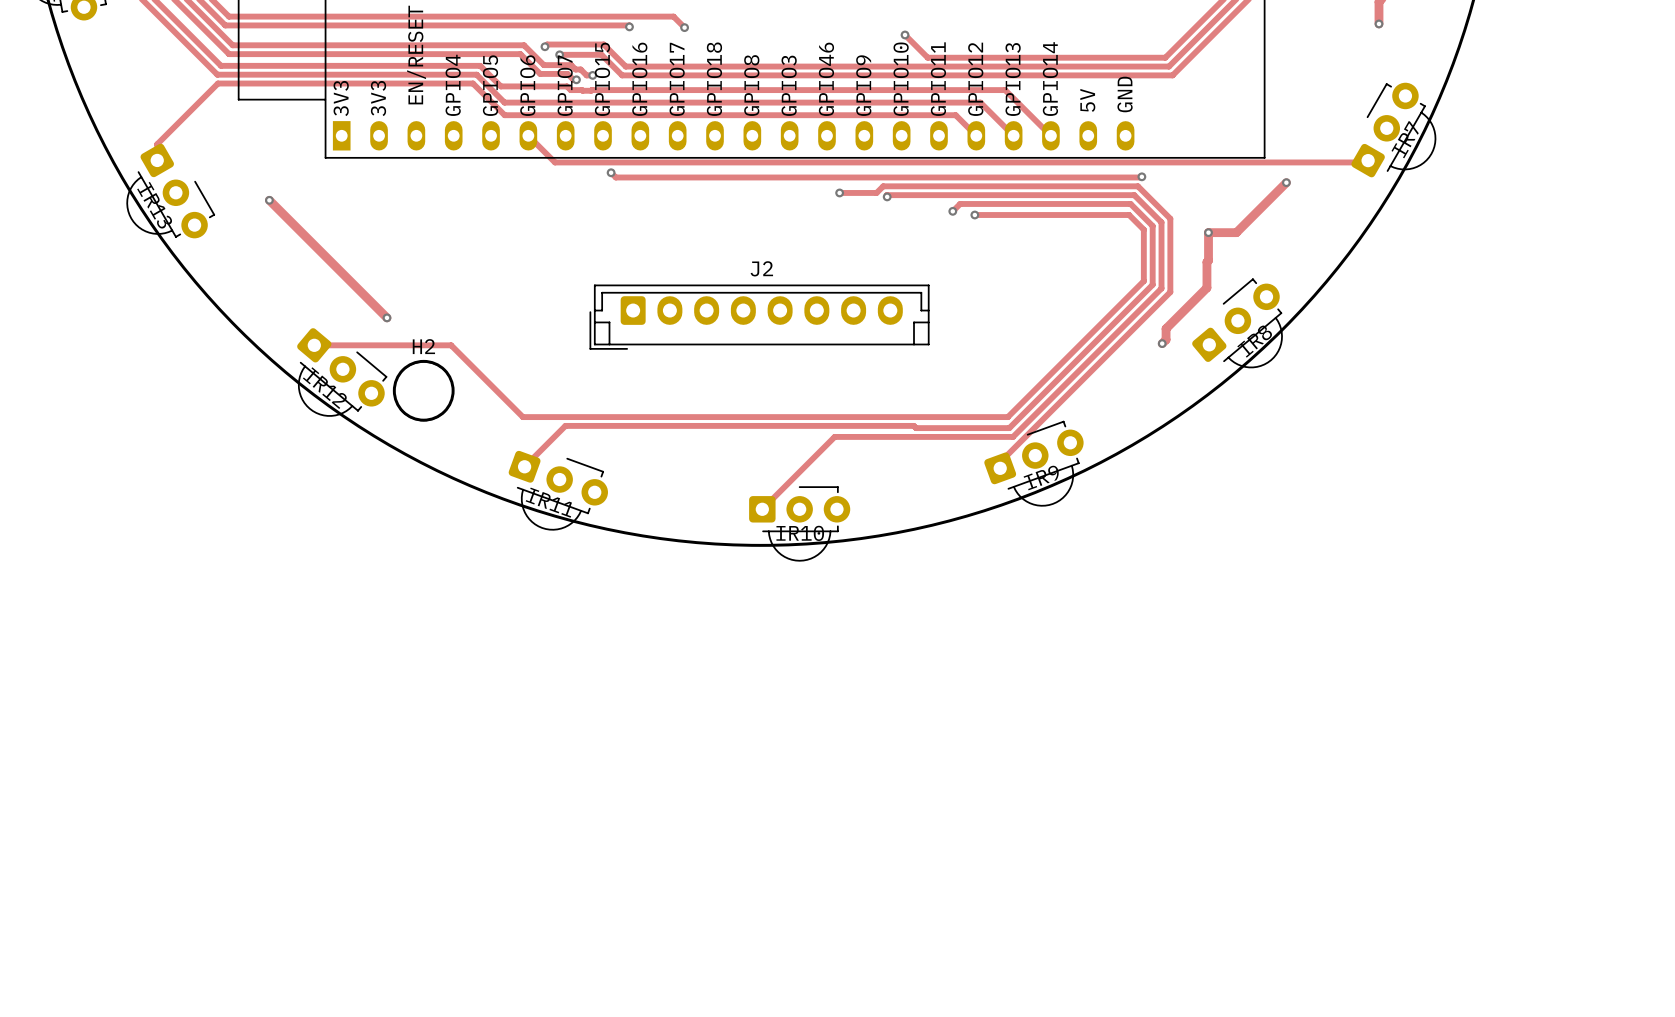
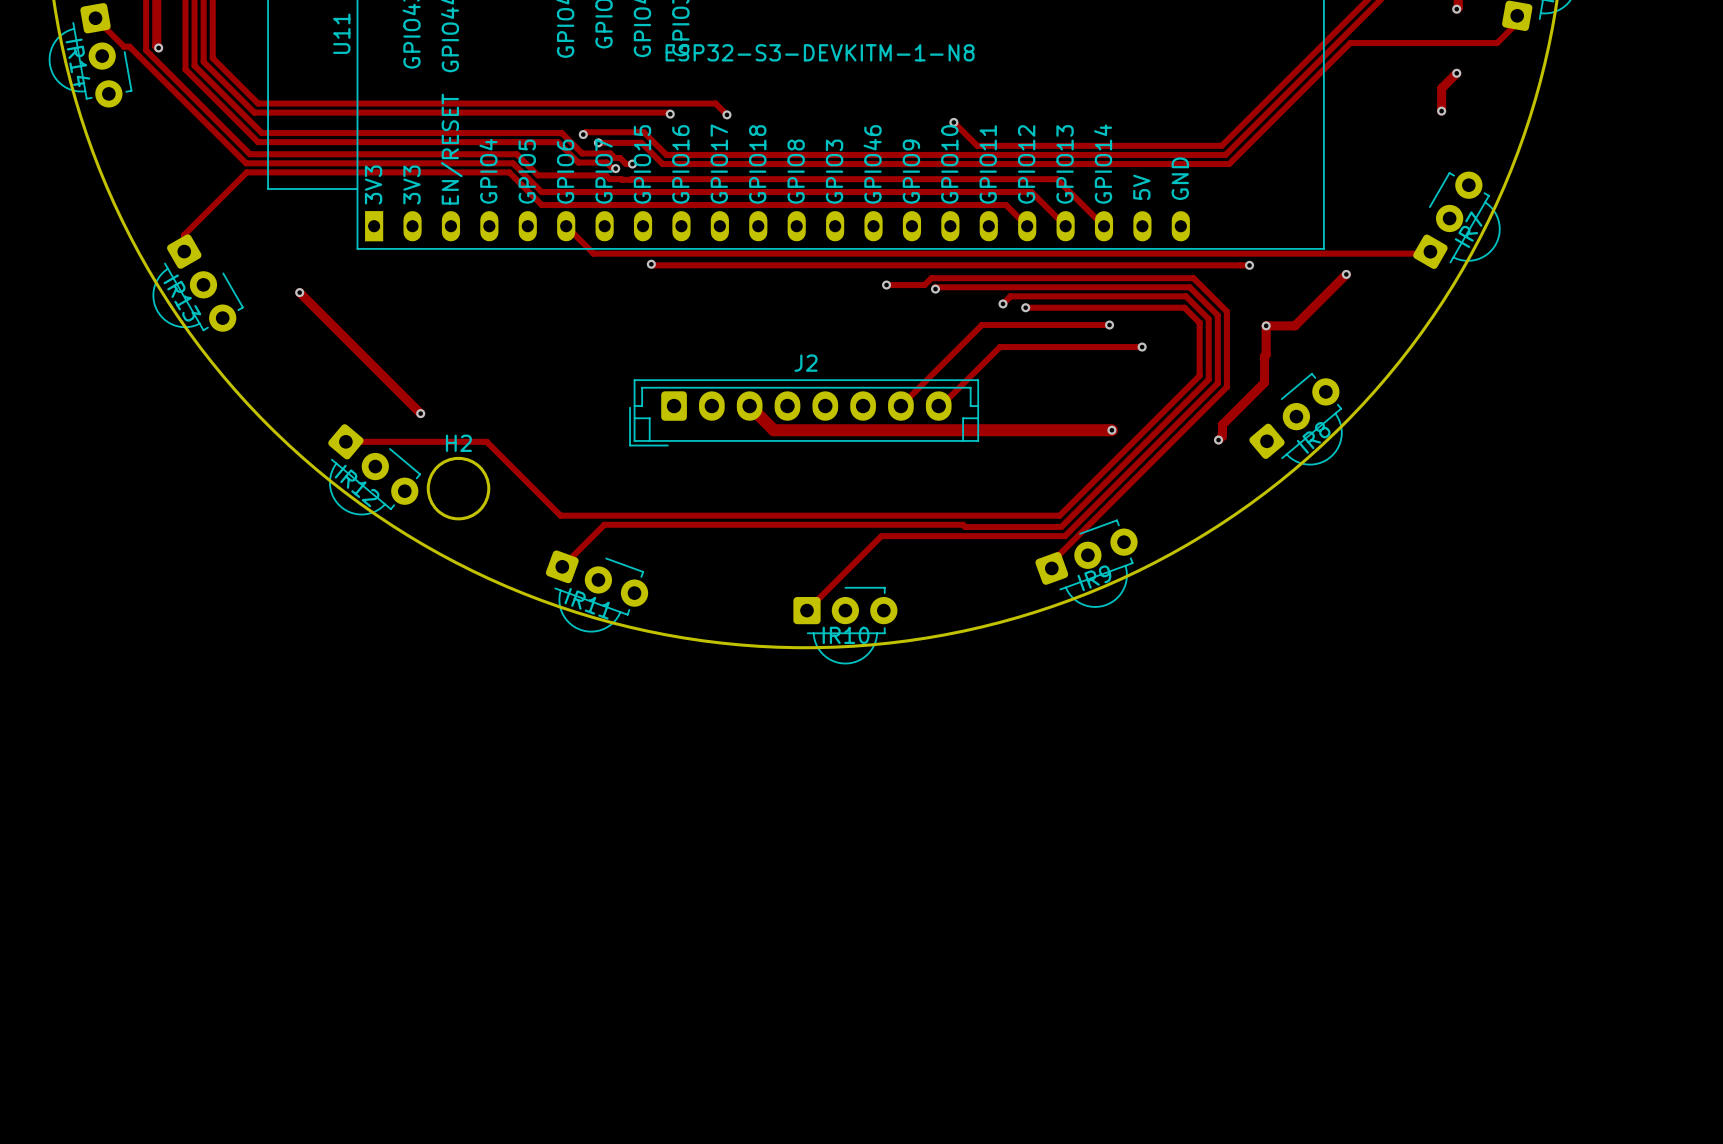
track: (612, 173) (615, 177) (1141, 177) -> (652, 265) (1249, 265)
via: none -> (1249, 265)
via: (1141, 176) -> none
track: none -> (1109, 325) (981, 325) (900, 406)
via: none -> (1109, 325)
track: none -> (1142, 347) (999, 347) (940, 406) (938, 406)
via: none -> (1142, 347)
track: none -> (749, 406) (773, 430) (1111, 430)
via: none -> (1111, 430)

